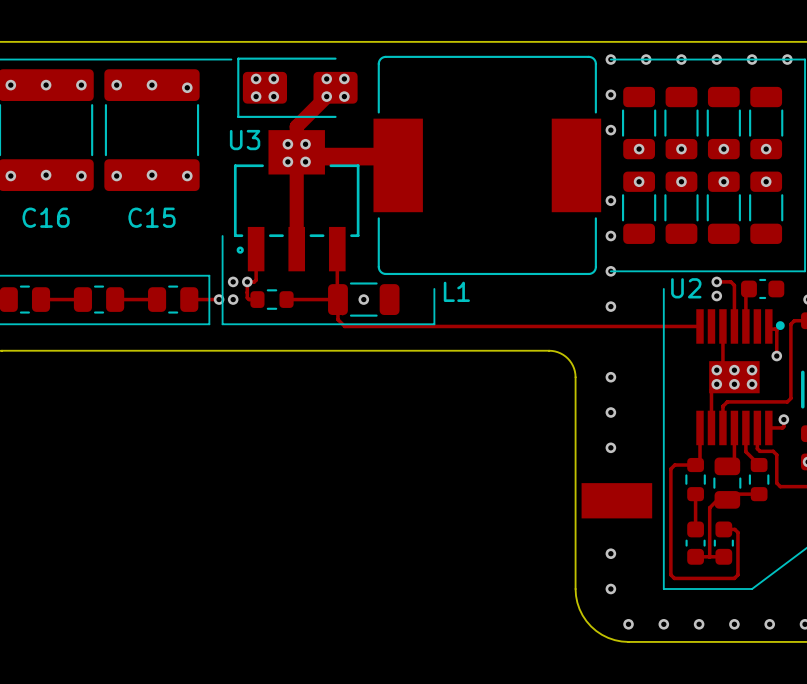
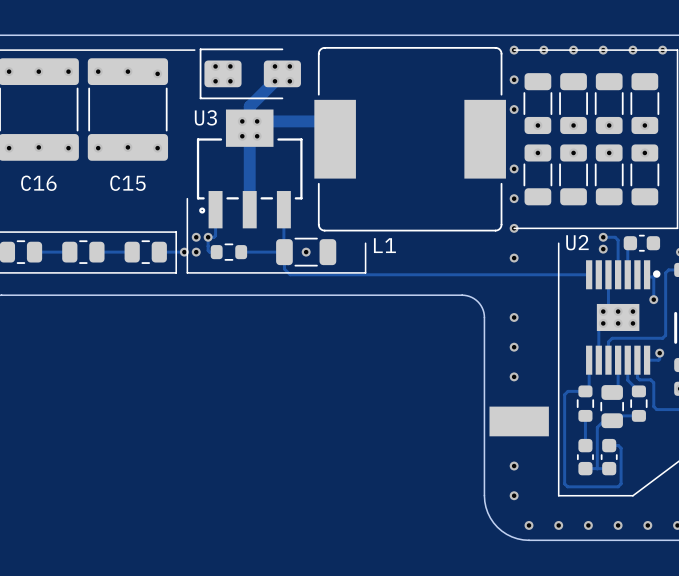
track: none -> (257, 121) (317, 121)
track: (296, 152) (301, 156) (389, 156) (398, 165) -> none

